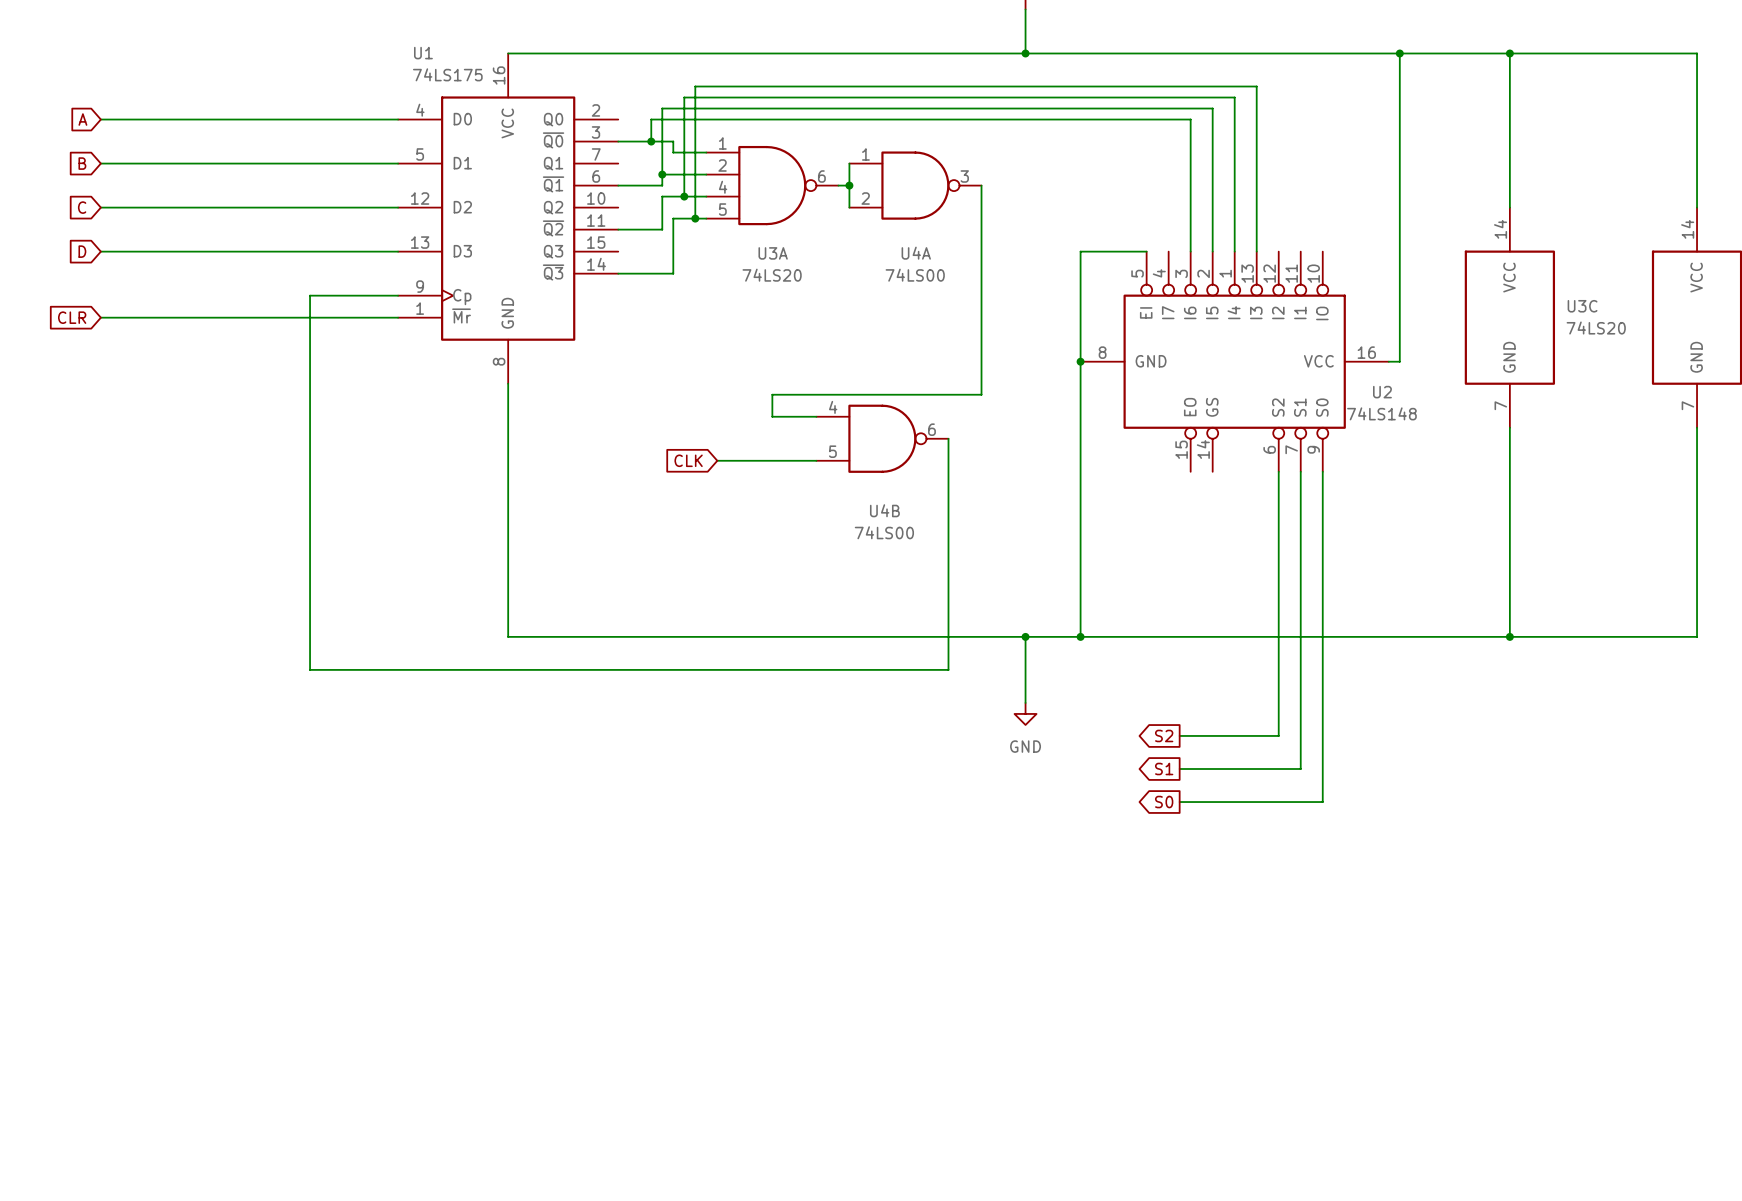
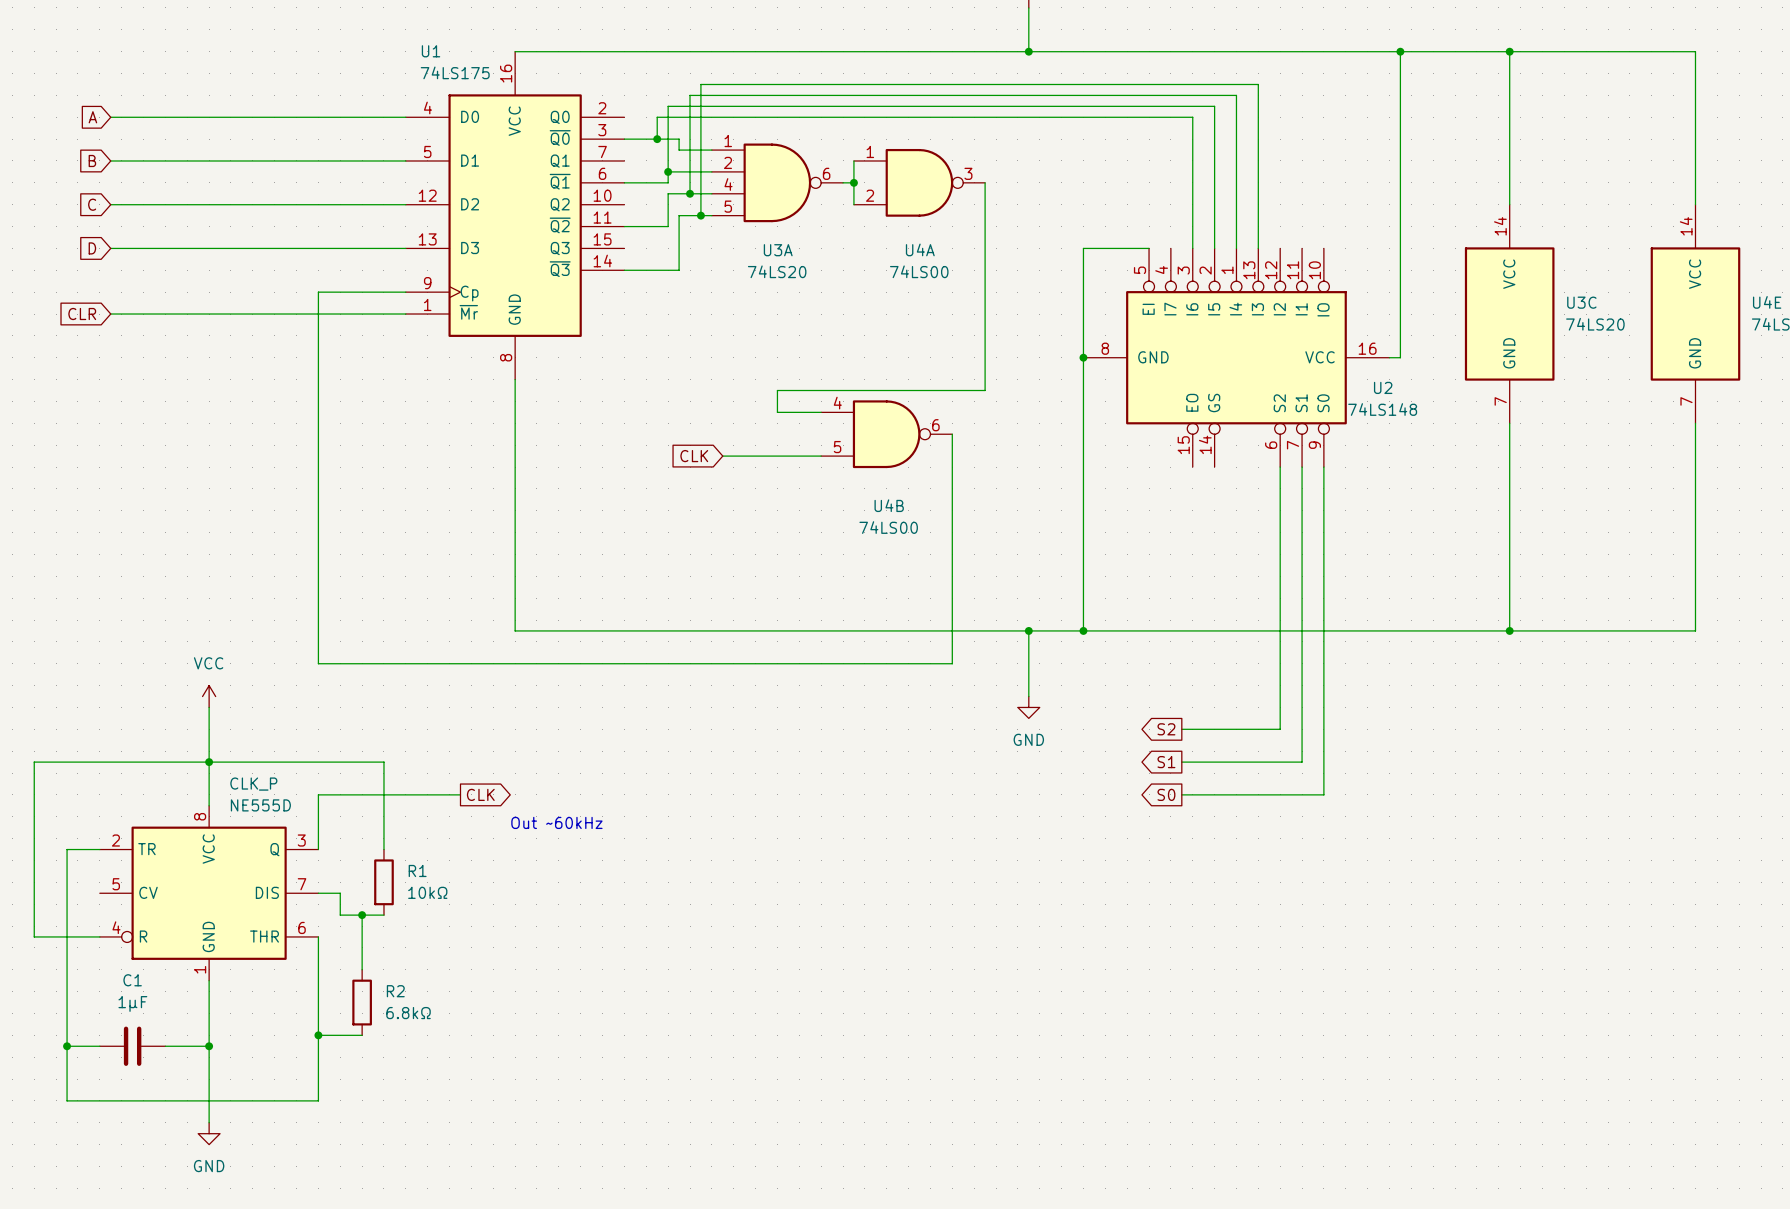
power symbol: none -> VCC (209, 696)
wire: none -> (209, 707) (209, 805)
junction: none -> (209, 762)
wire: none -> (460, 794) (318, 794) (318, 849)
global label: none -> CLK (480, 794)
text: none -> Out ~60kHz (556, 822)
wire: none -> (99, 849) (67, 849) (67, 1100) (318, 1100) (318, 936)
wire: none -> (383, 849) (383, 762) (34, 762) (34, 936) (99, 936)
R1: none -> 10kΩ (383, 882)
CLK_P: none -> NE555D (209, 893)
wire: none -> (318, 893) (340, 893) (340, 915) (383, 915)
wire: none -> (362, 915) (362, 969)
junction: none -> (362, 915)
wire: none -> (209, 980) (209, 1122)
R2: none -> 6.8kΩ (362, 1002)
wire: none -> (318, 1035) (362, 1035)
junction: none -> (318, 1035)
wire: none -> (67, 1046) (99, 1046)
junction: none -> (67, 1046)
C1: none -> 1μF (132, 1046)
wire: none -> (165, 1046) (209, 1046)
junction: none -> (209, 1046)
power symbol: none -> GND (209, 1133)

